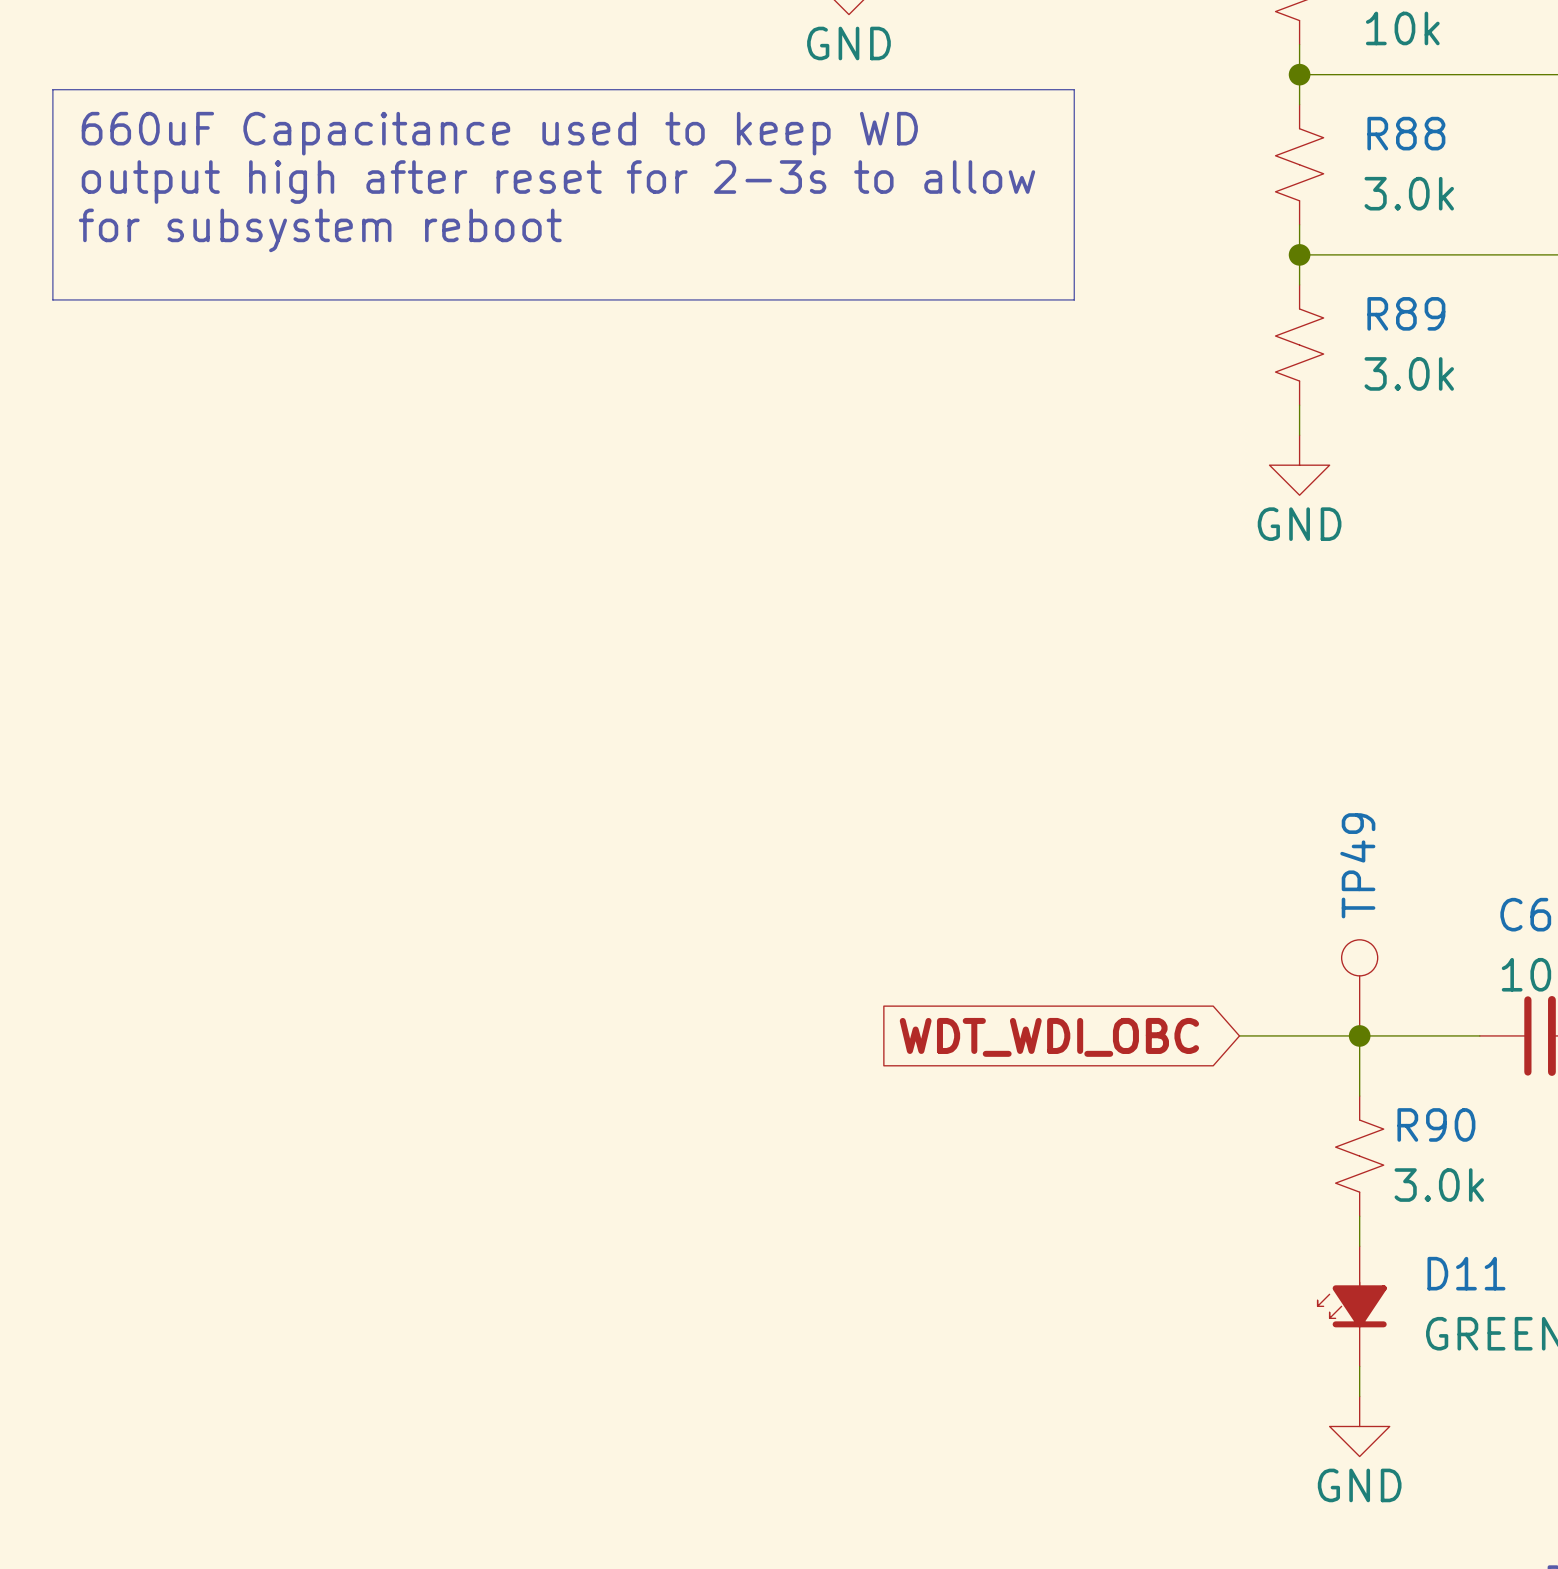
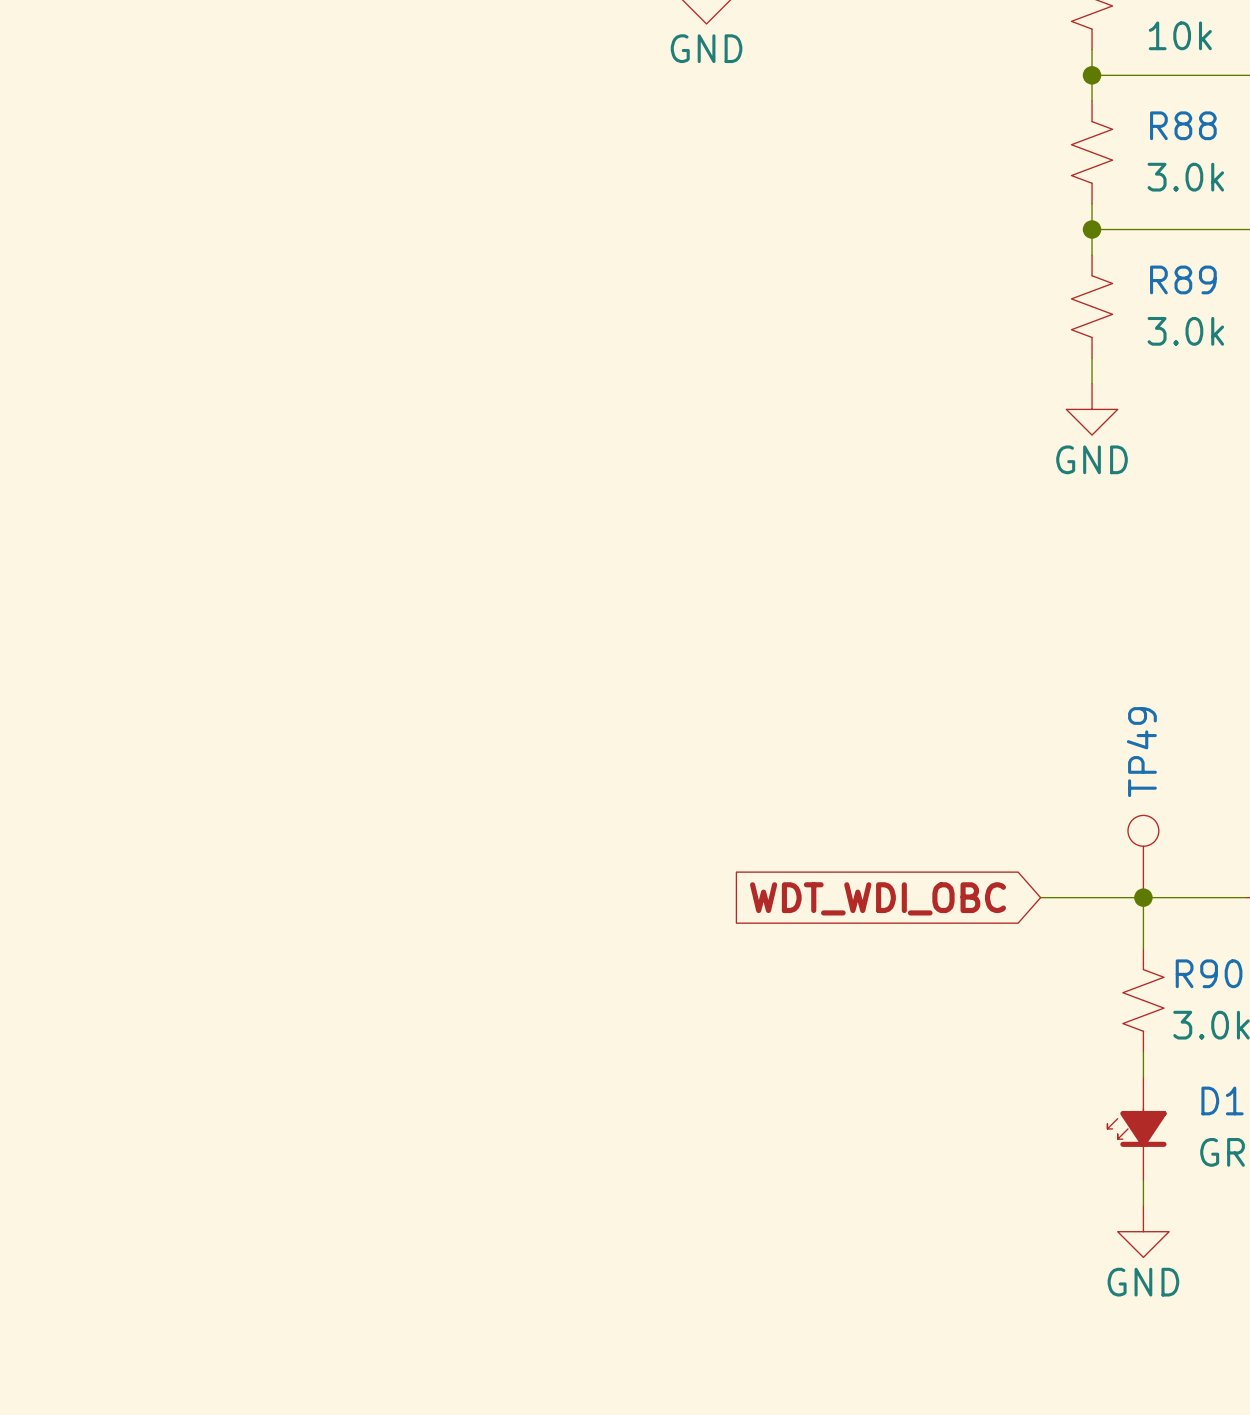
line: (52, 89) (1074, 89) (1074, 299) (52, 299) (52, 89) -> none
text: 660uF Capacitance used to keep WD (499, 133) -> none
text: output high after reset for 2-3s to allow (558, 182) -> none
text: for subsystem reboot (320, 230) -> none

